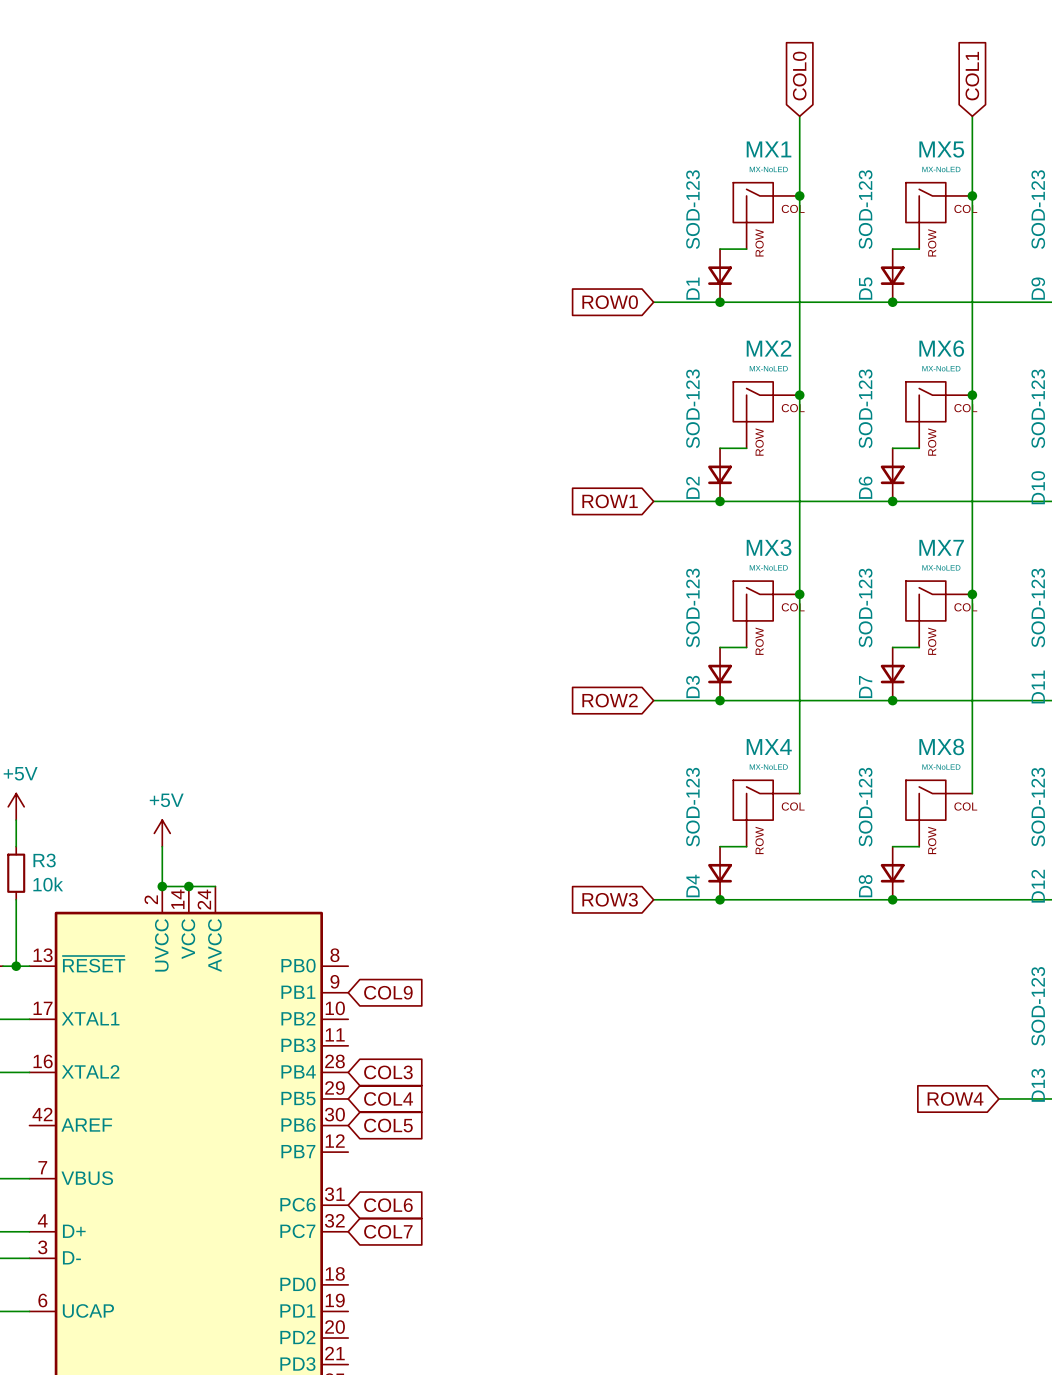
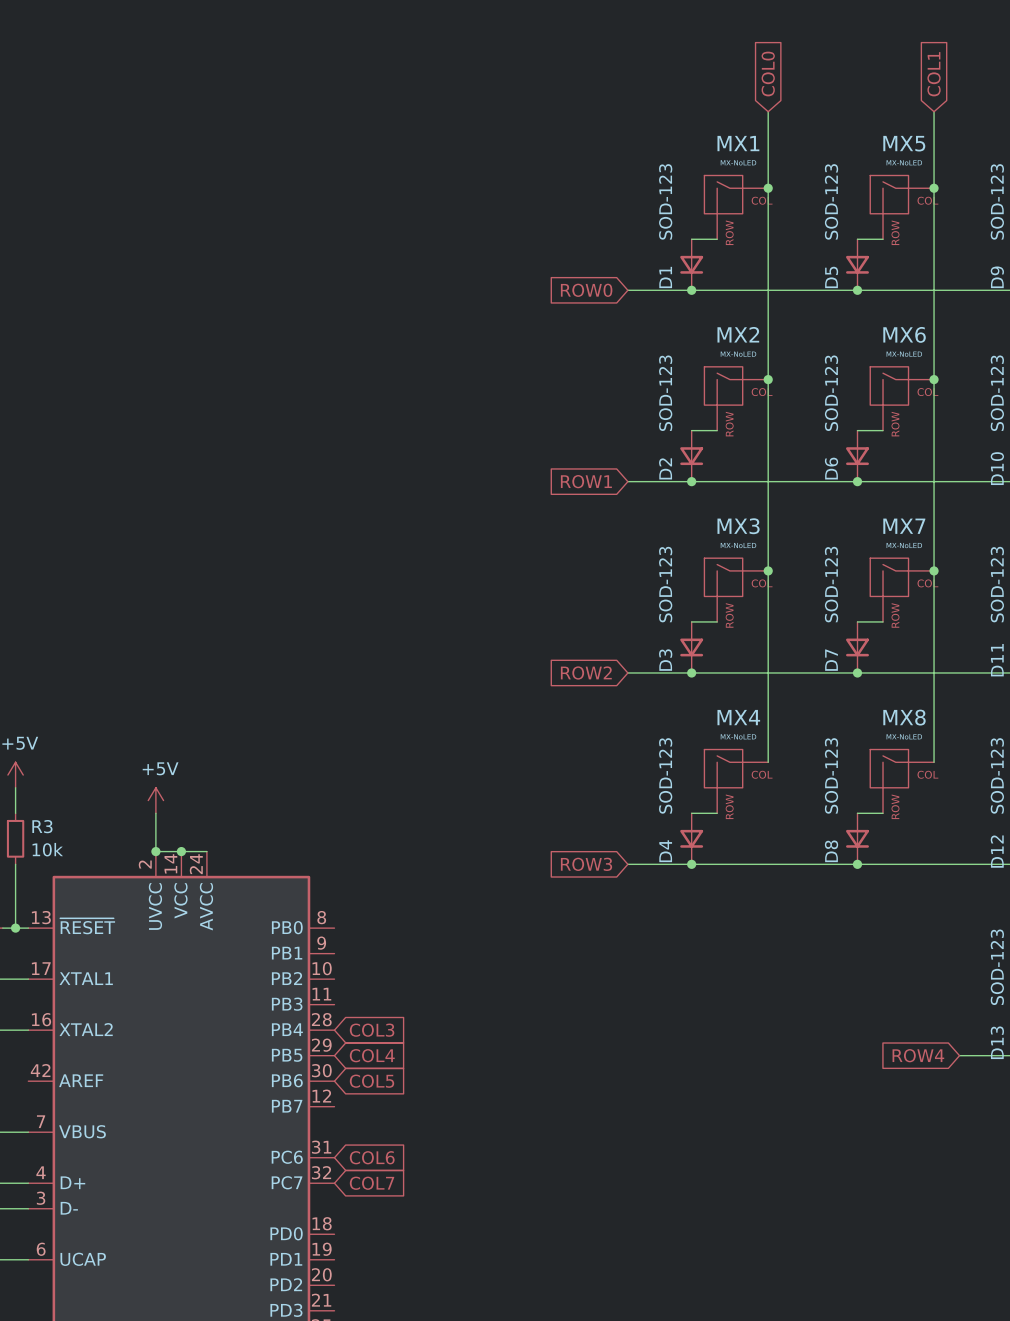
global label: COL9 (388, 992) -> none

